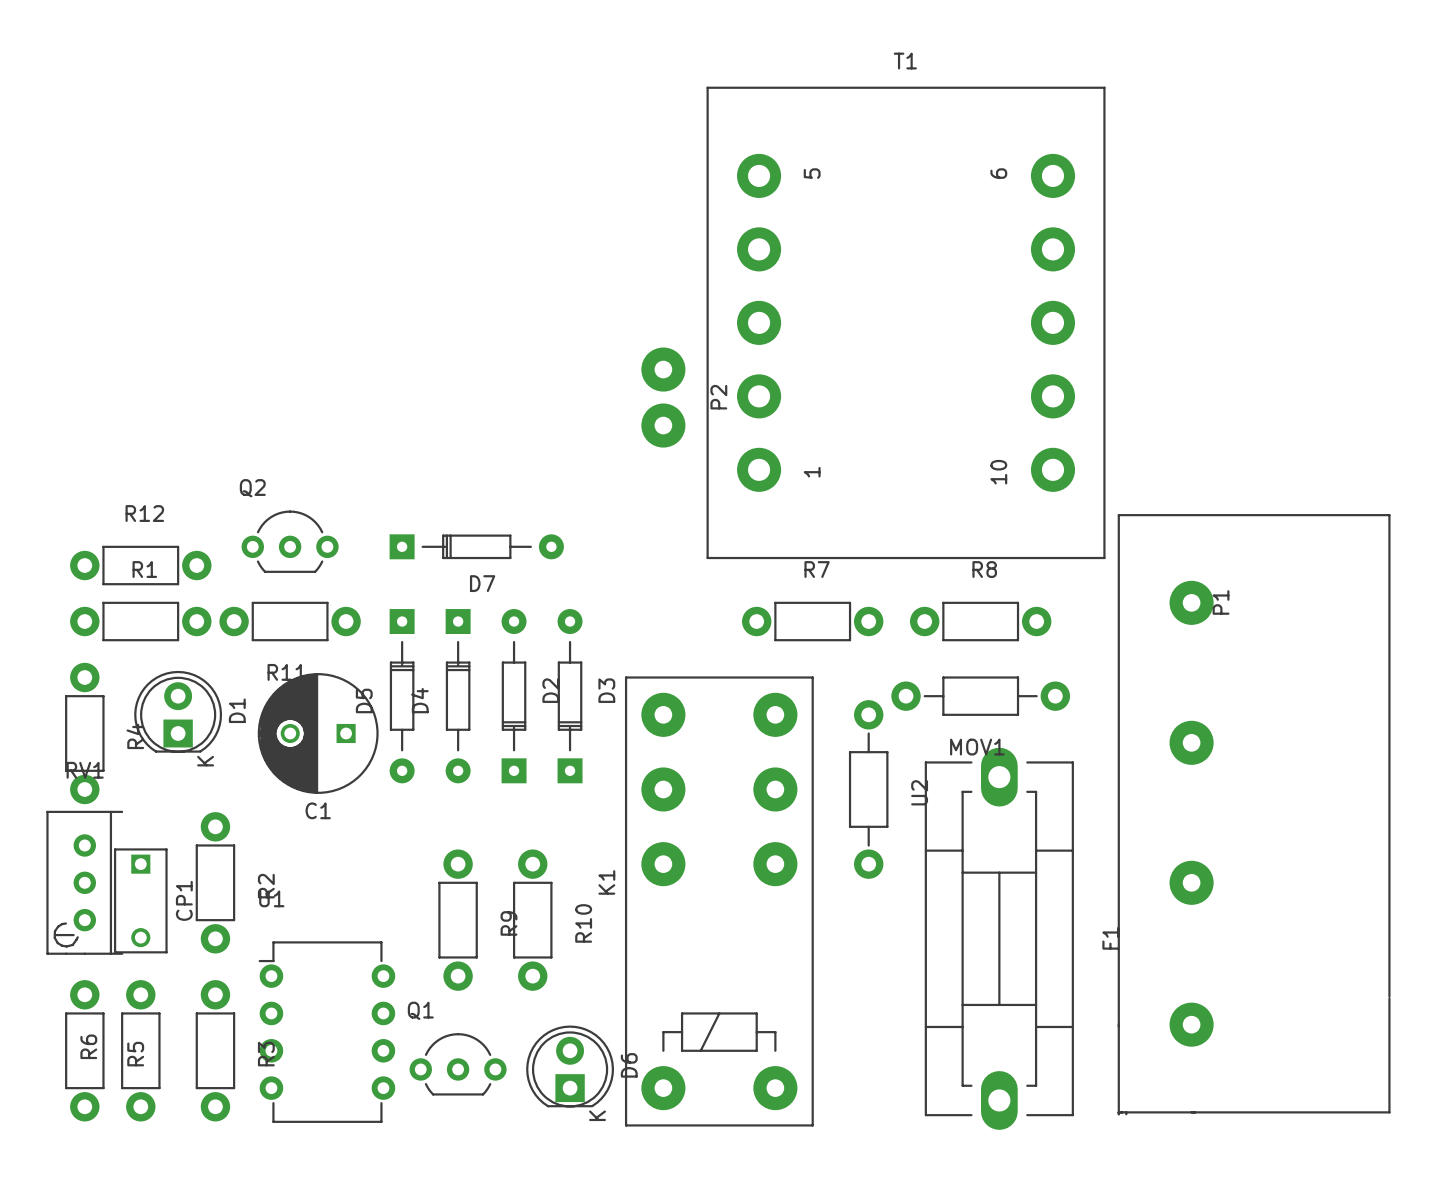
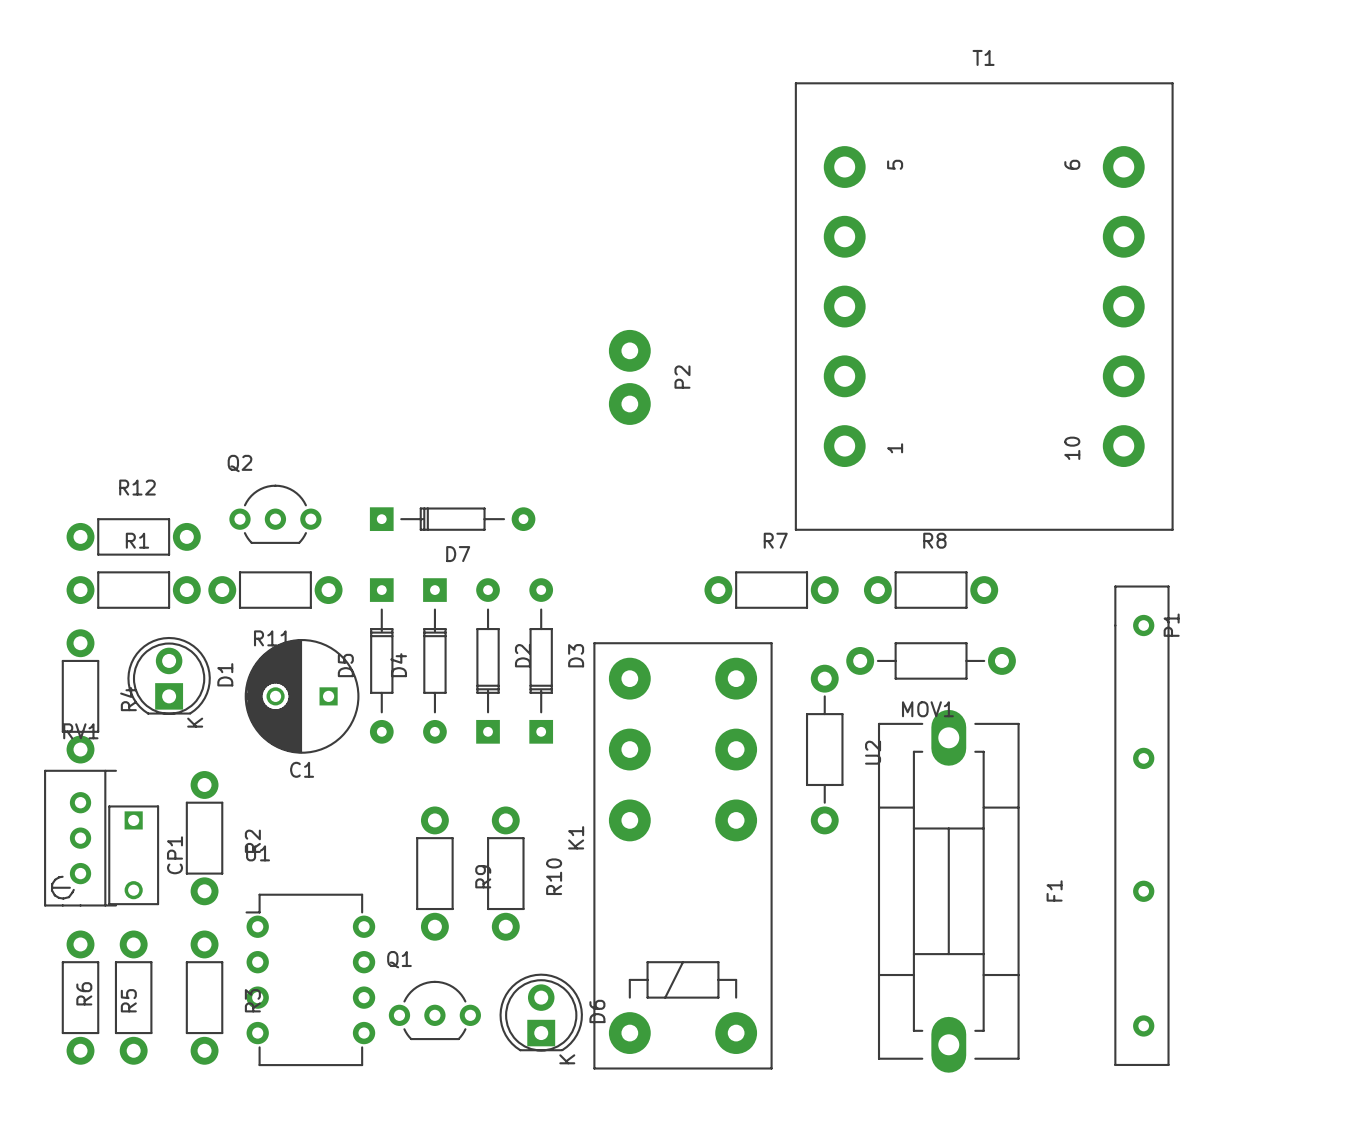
T1 position: (906, 322) -> (984, 306)
P1 footprint: [1117, 514, 1391, 1116] -> [1114, 585, 1170, 1067]
P1 name position: P1 (1221, 602) -> P1 (1171, 625)

